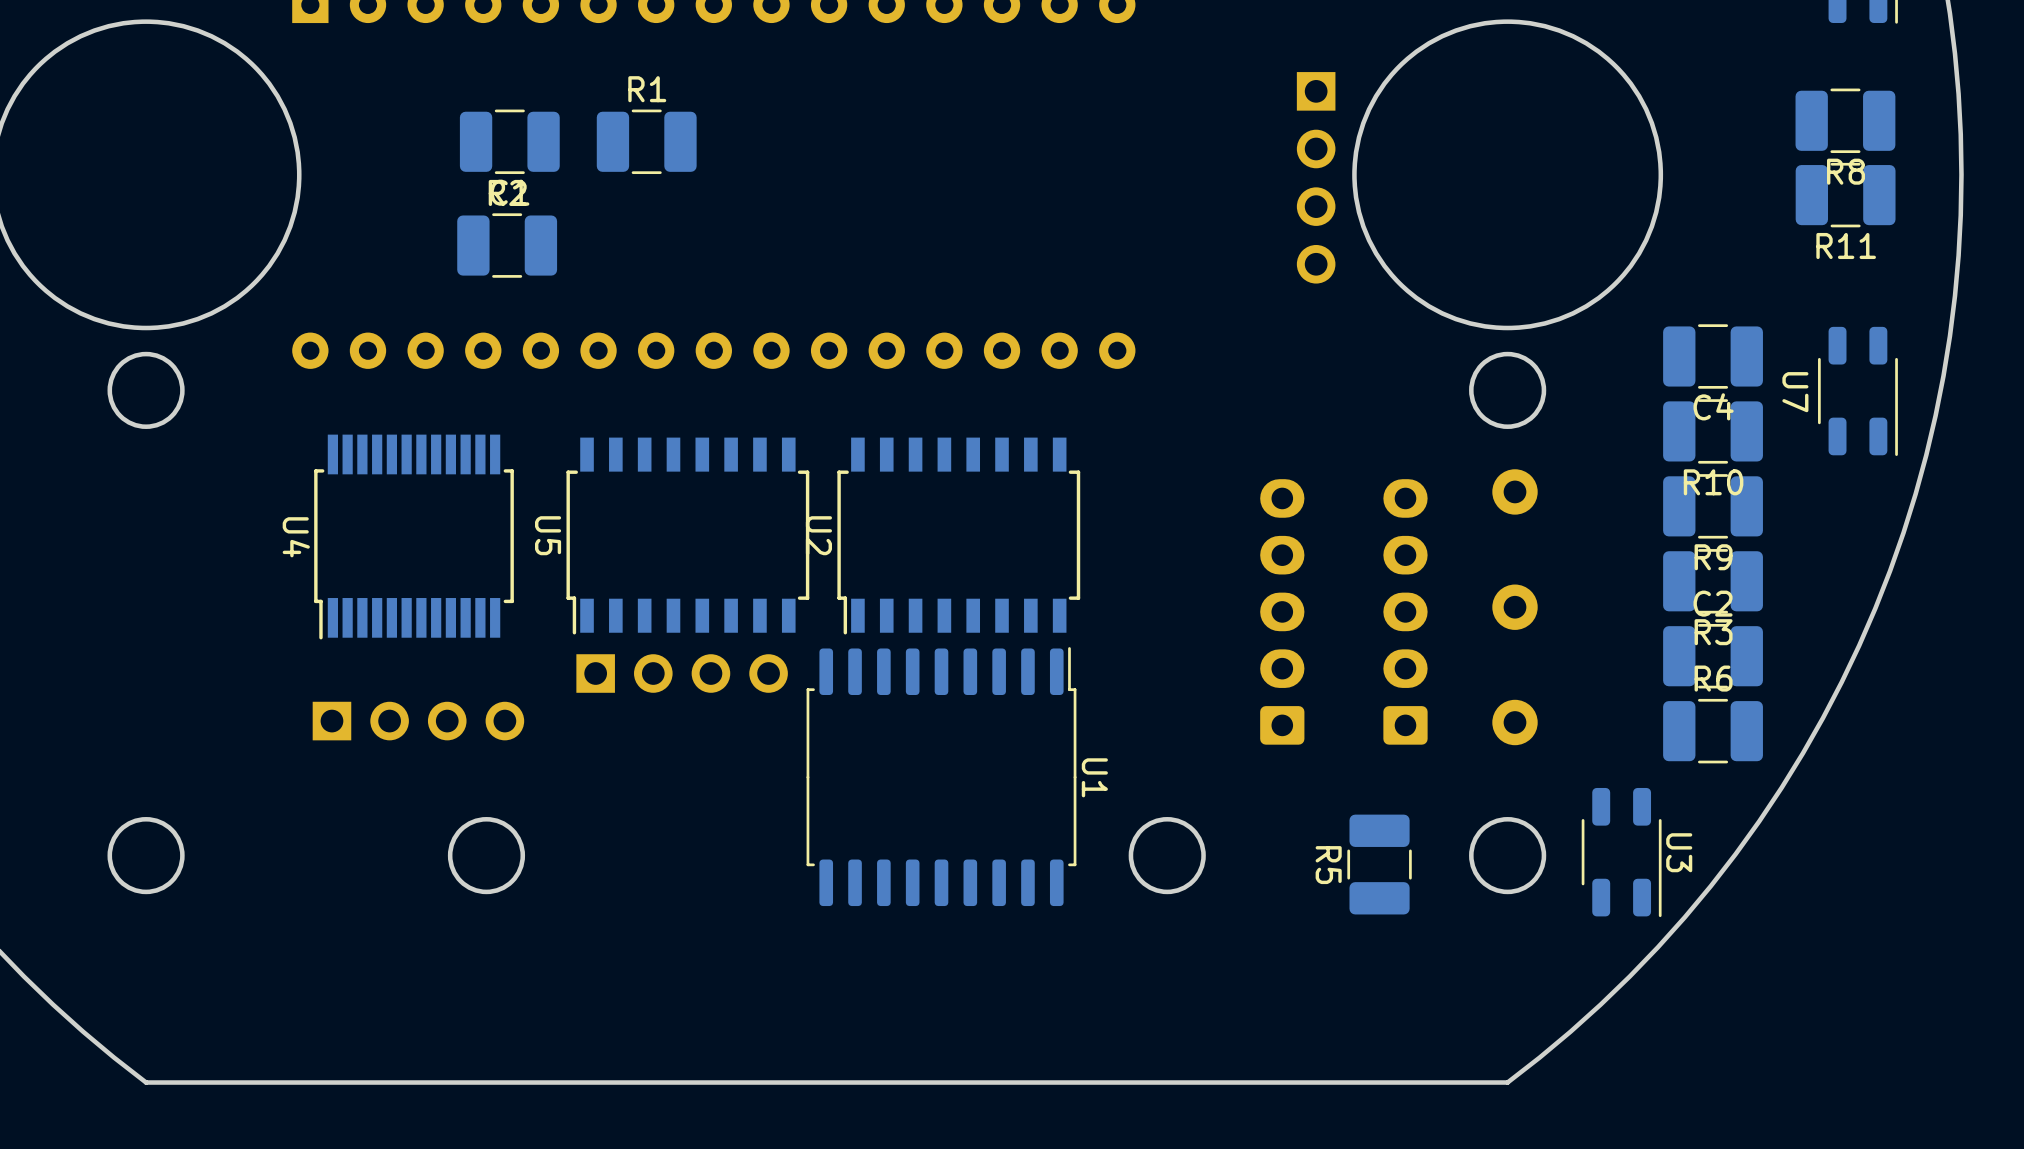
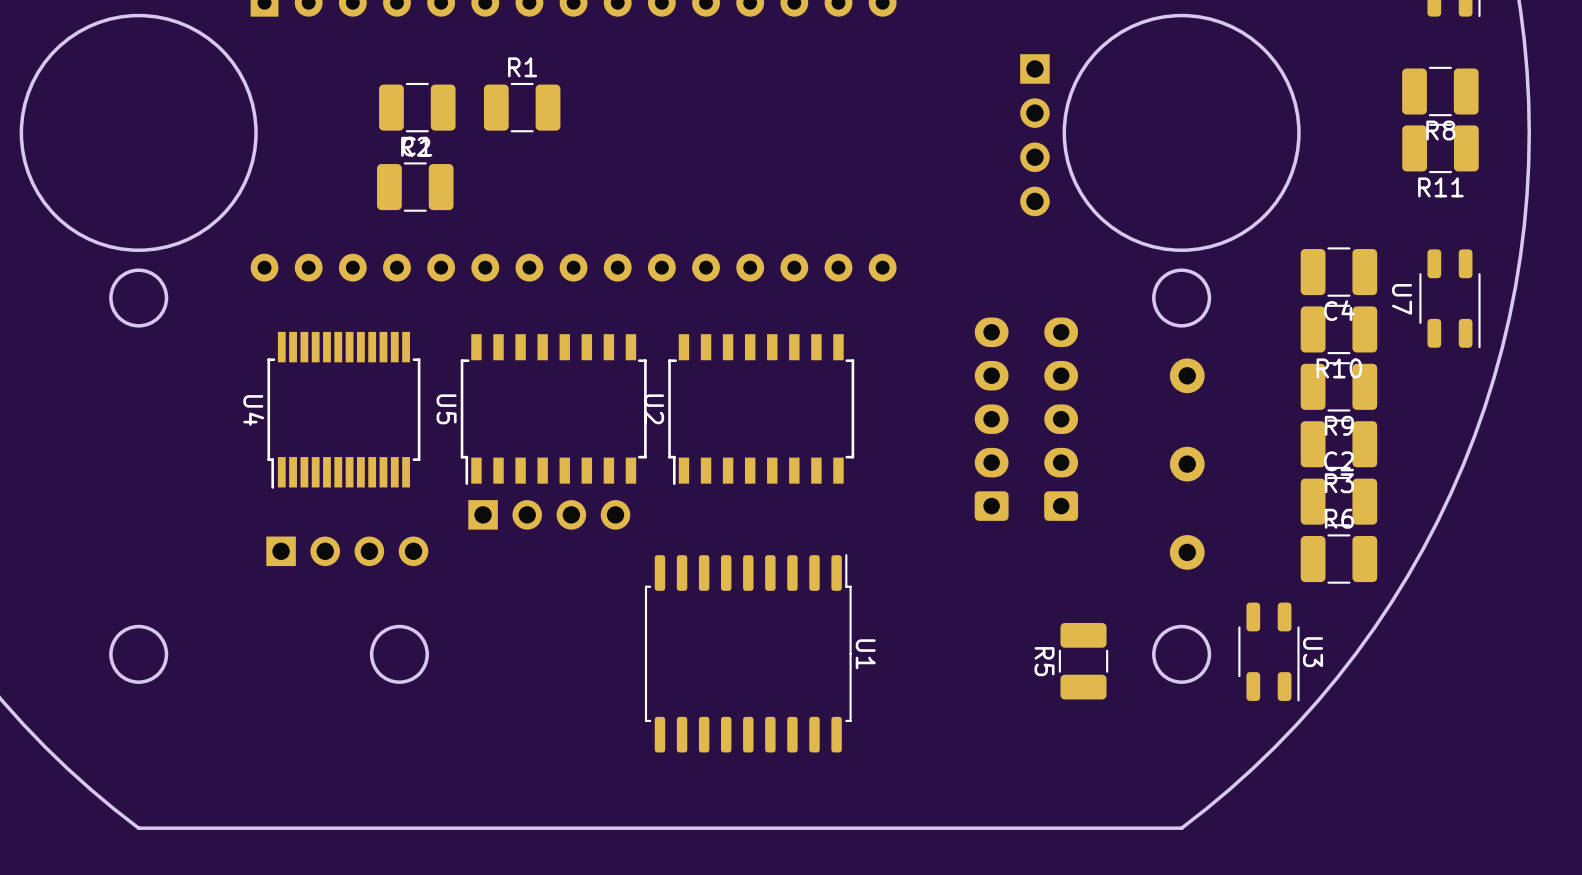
part: none -> (991, 419)
part: none -> (1061, 419)
part: (1282, 611) -> none
part: (1405, 611) -> none
U1 position: (941, 776) -> (748, 653)
round board edge: [1128, 817, 1206, 895] -> none

